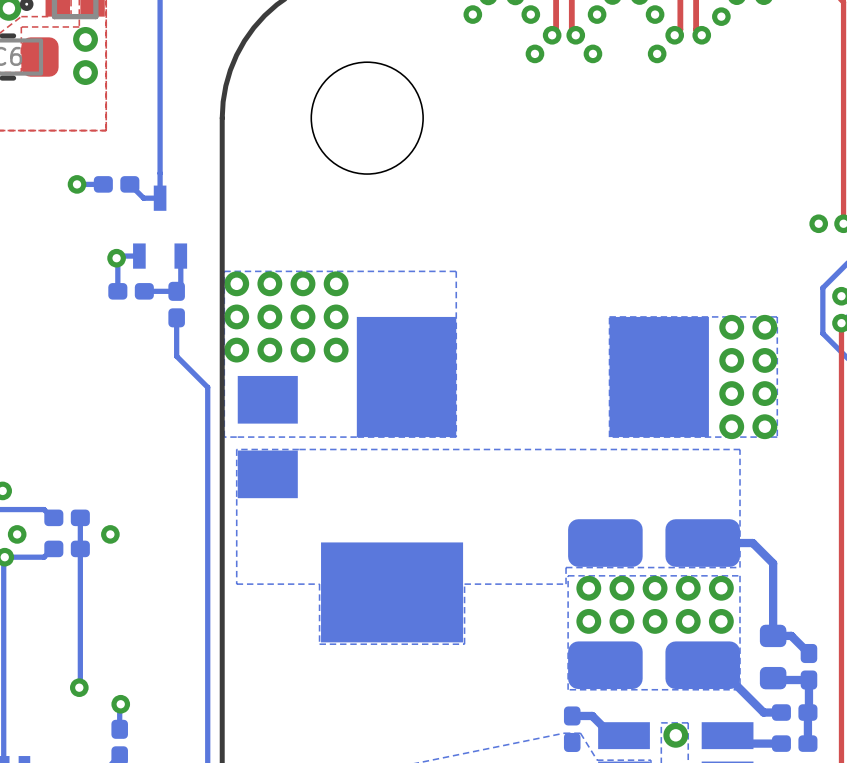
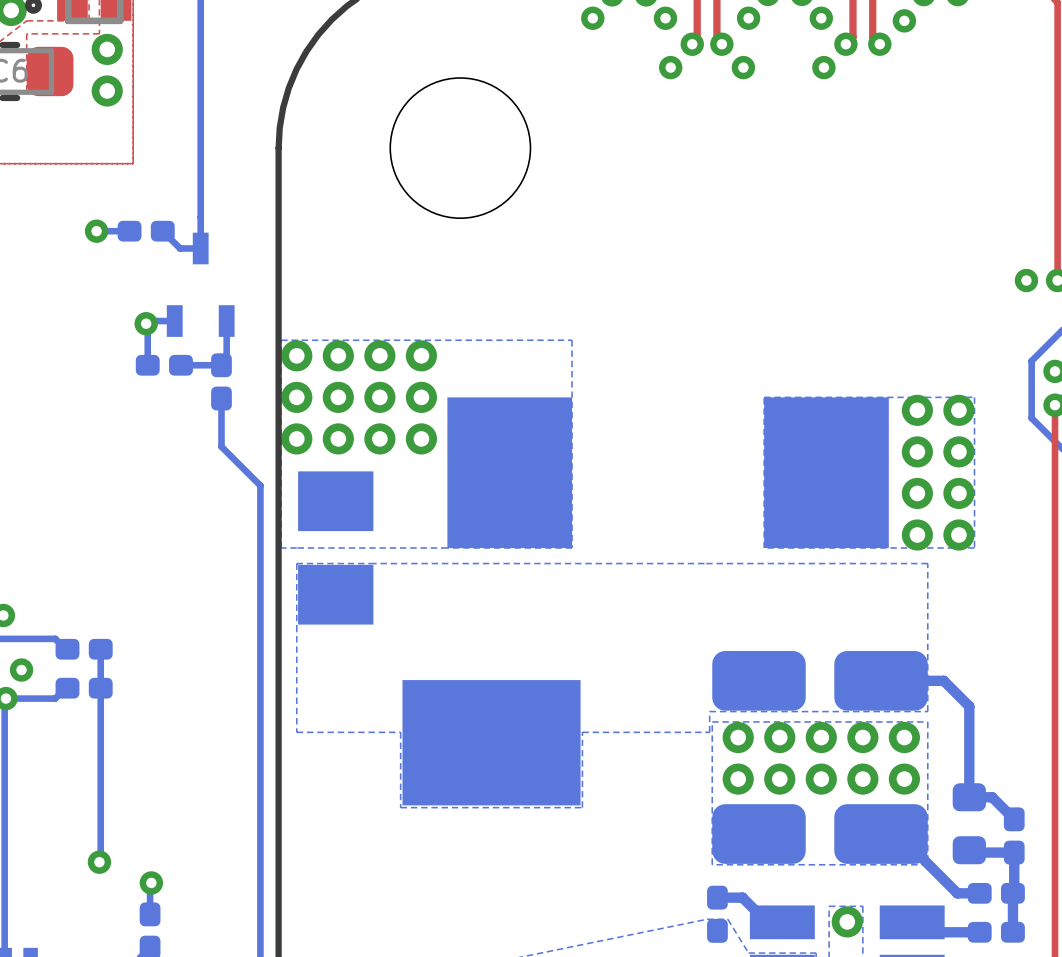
via: (110, 534) -> none

